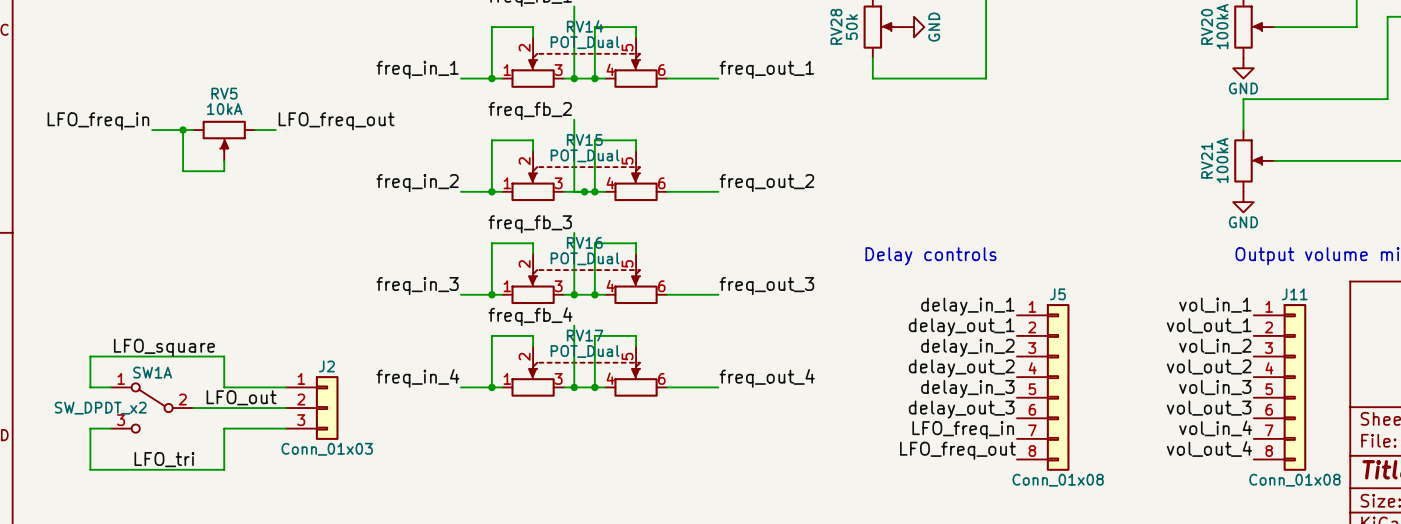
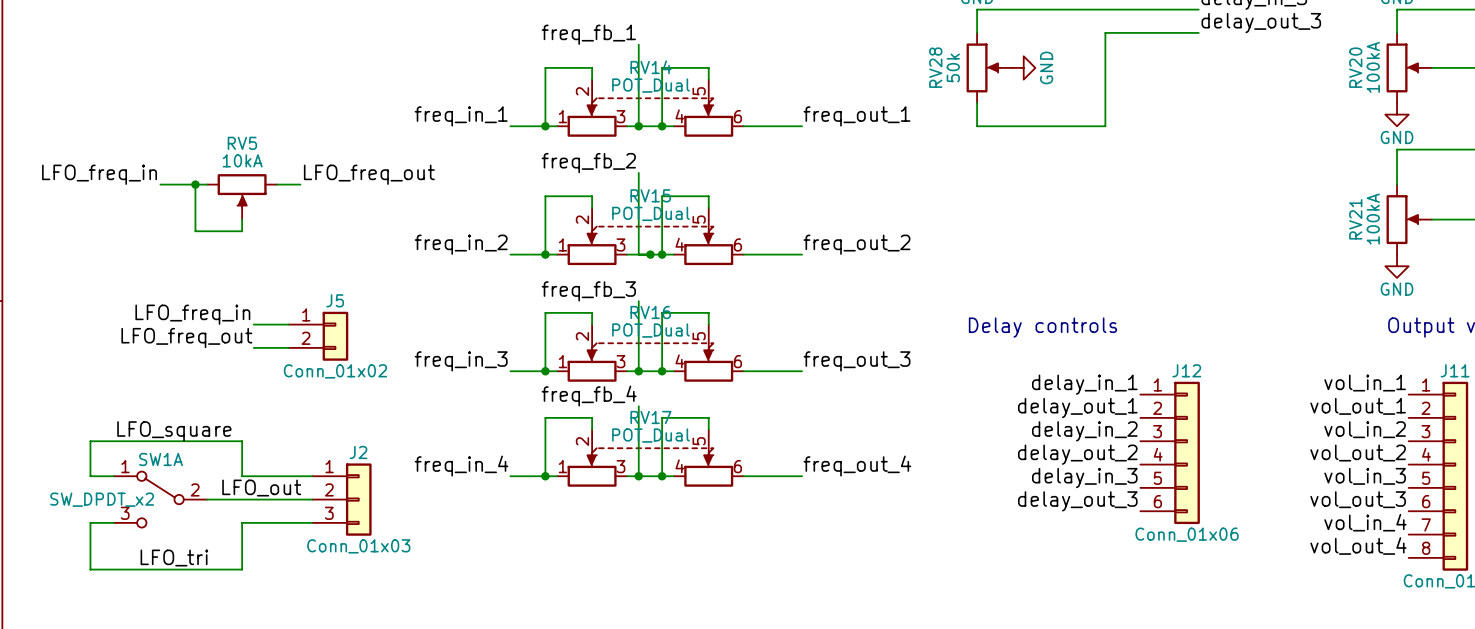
label: none -> LFO_freq_in (192, 314)
wire: none -> (253, 324) (288, 324)
label: none -> LFO_freq_out (186, 338)
wire: none -> (253, 347) (288, 347)
J5 name position: J5 (1057, 294) -> J5 (335, 300)
J5 symbol: [1016, 304, 1070, 471] -> [288, 311, 349, 361]
J12: none -> Conn_01x06 (1170, 452)
label: LFO_freq_in (963, 430) -> none
label: LFO_freq_out (957, 450) -> none
J5 value: Conn_01x08 (1058, 480) -> Conn_01x02 (335, 371)

